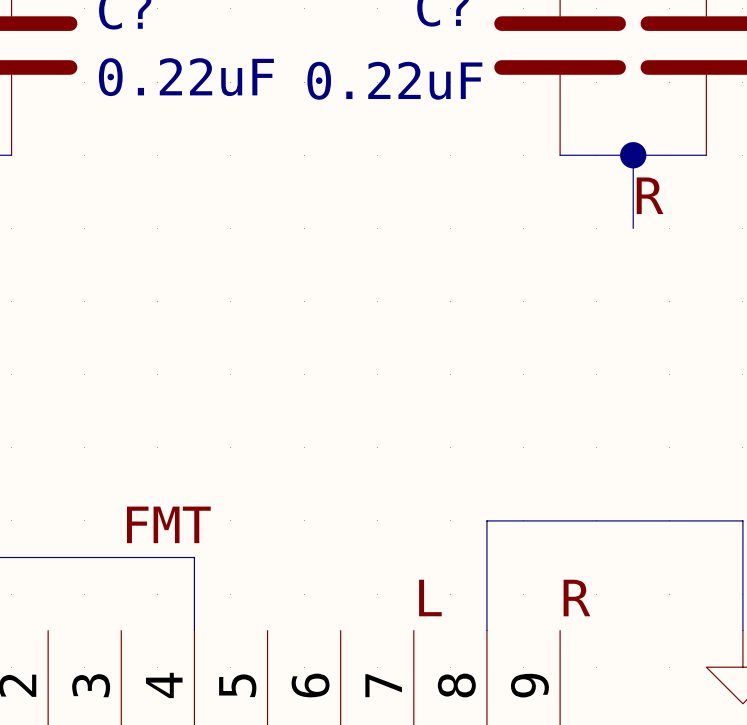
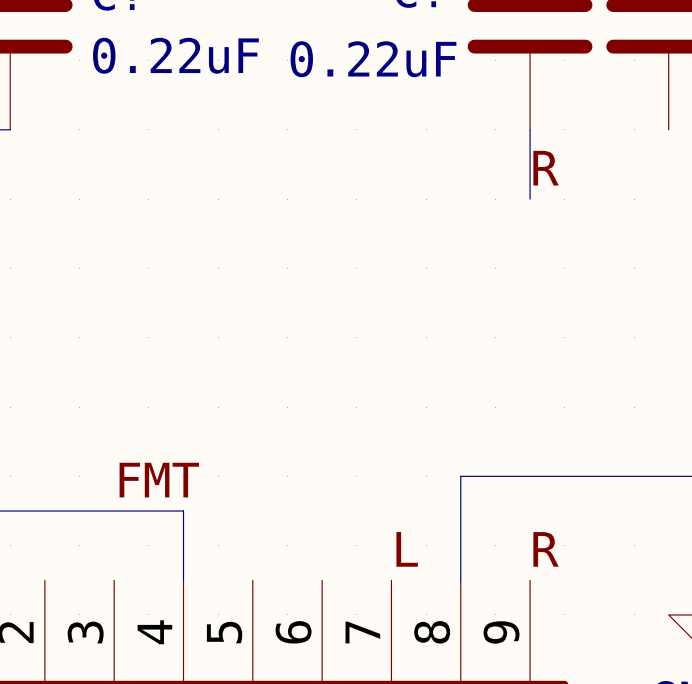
wire: (560, 155) (706, 155) -> (530, 129) (530, 199)
wire: (633, 155) (633, 228) -> none
junction: (633, 155) -> none
label position: R (650, 195) -> R (546, 168)

